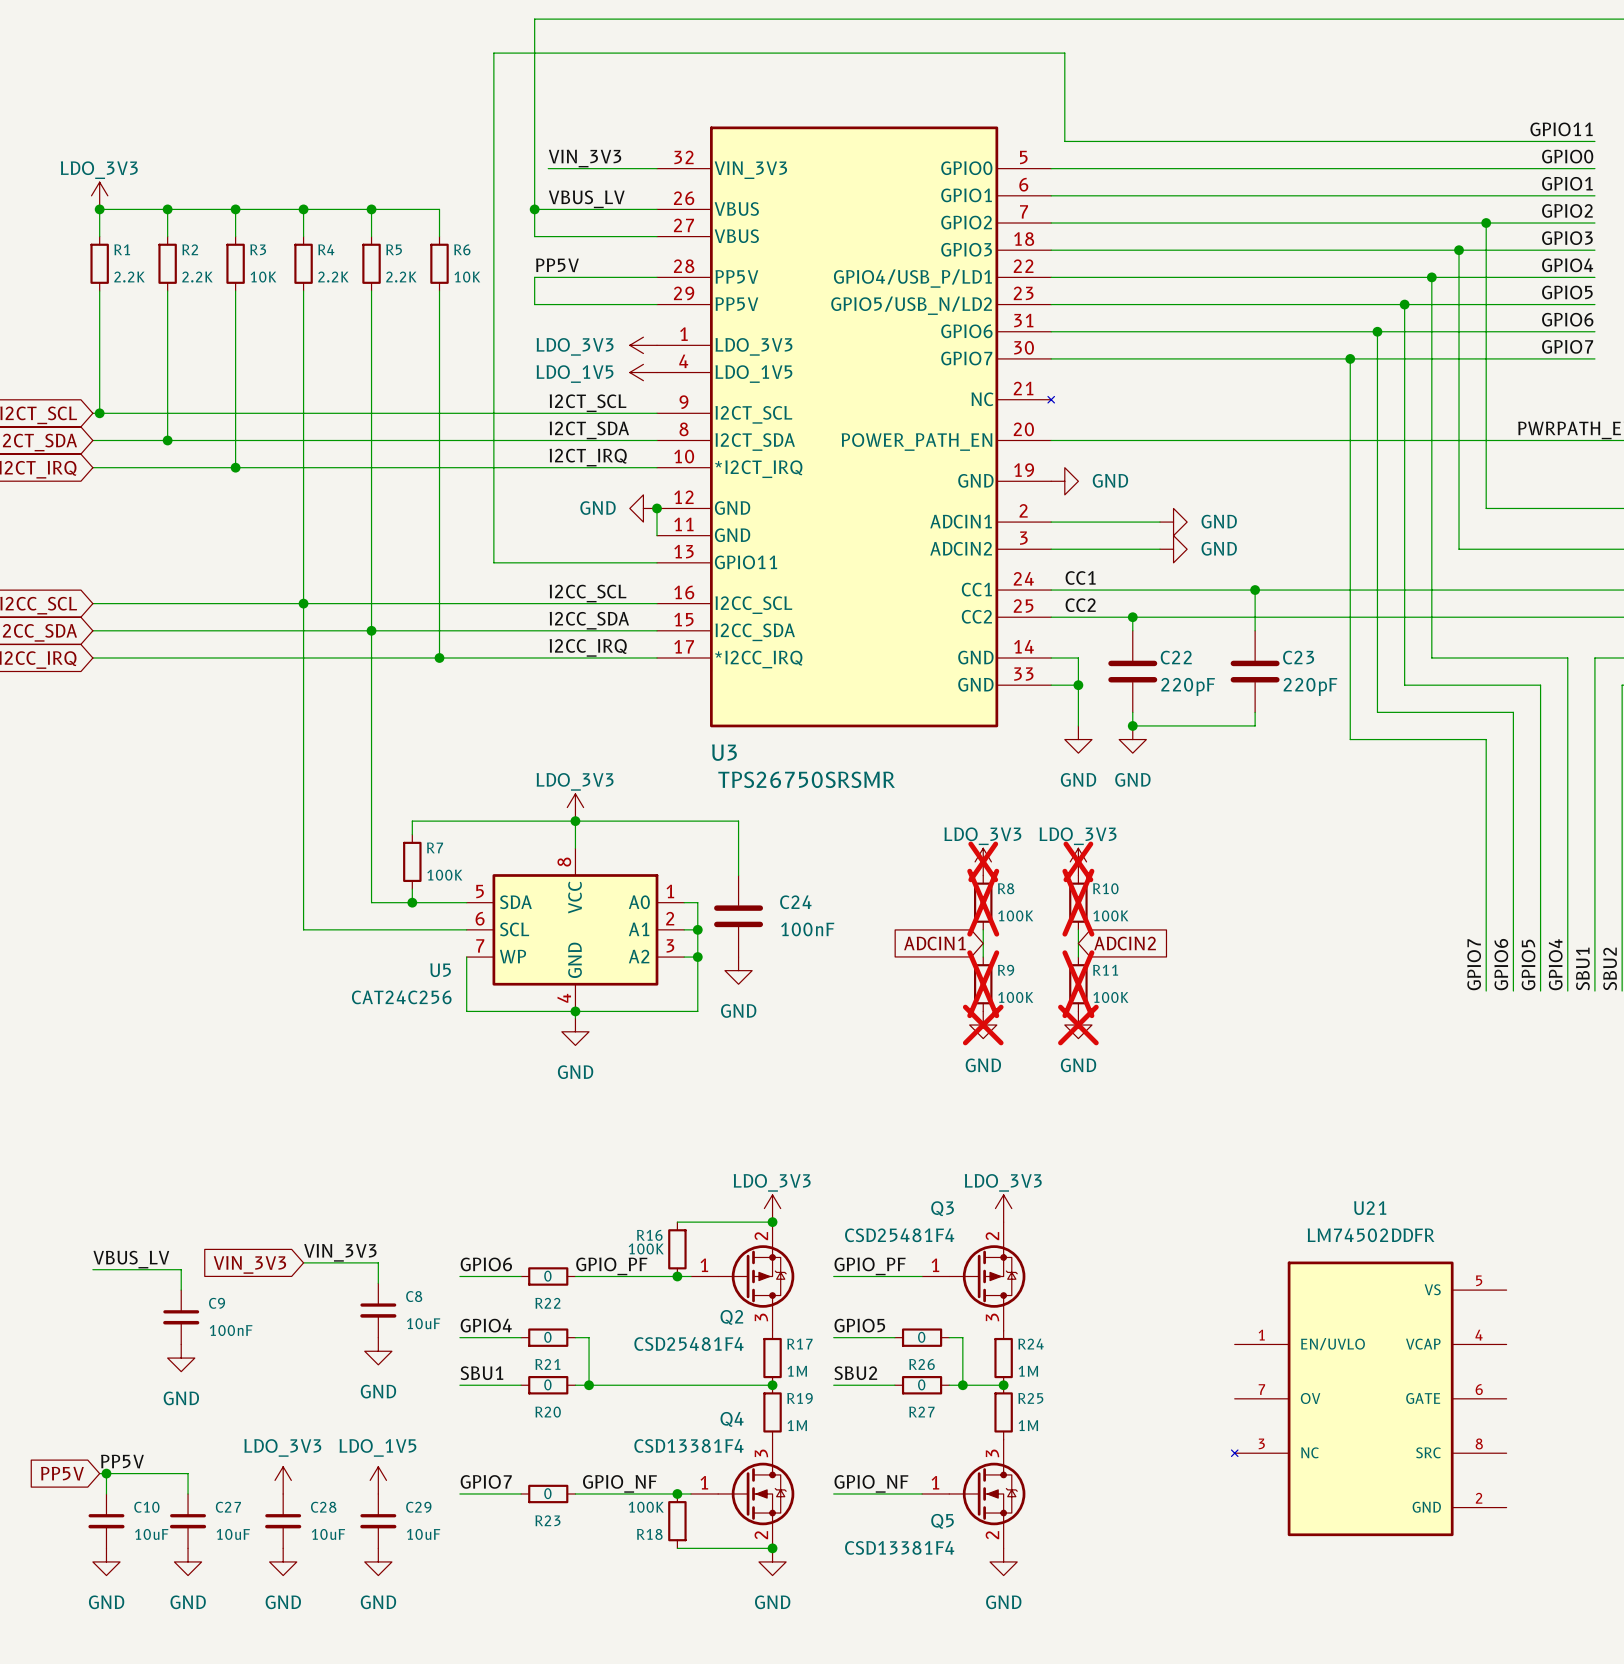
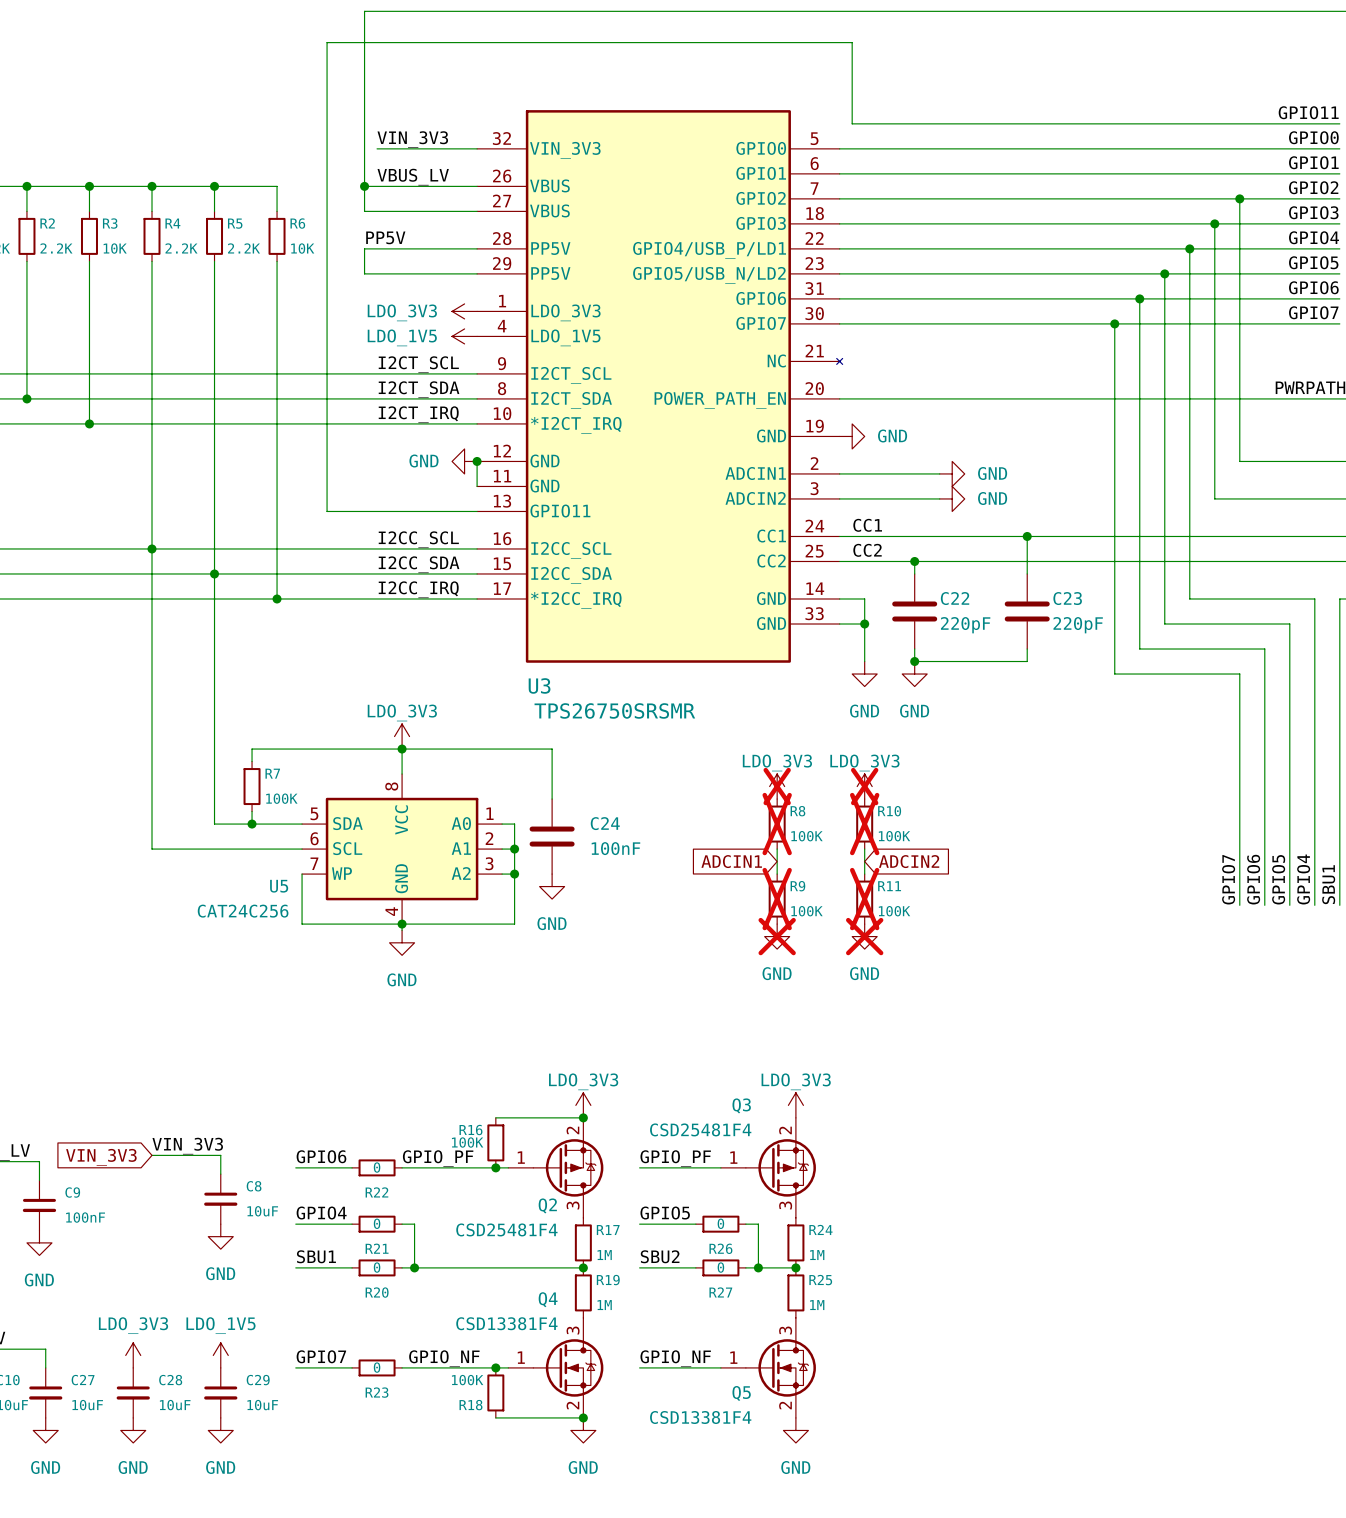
U21: LM74502DDFR (1369, 1398) -> none

